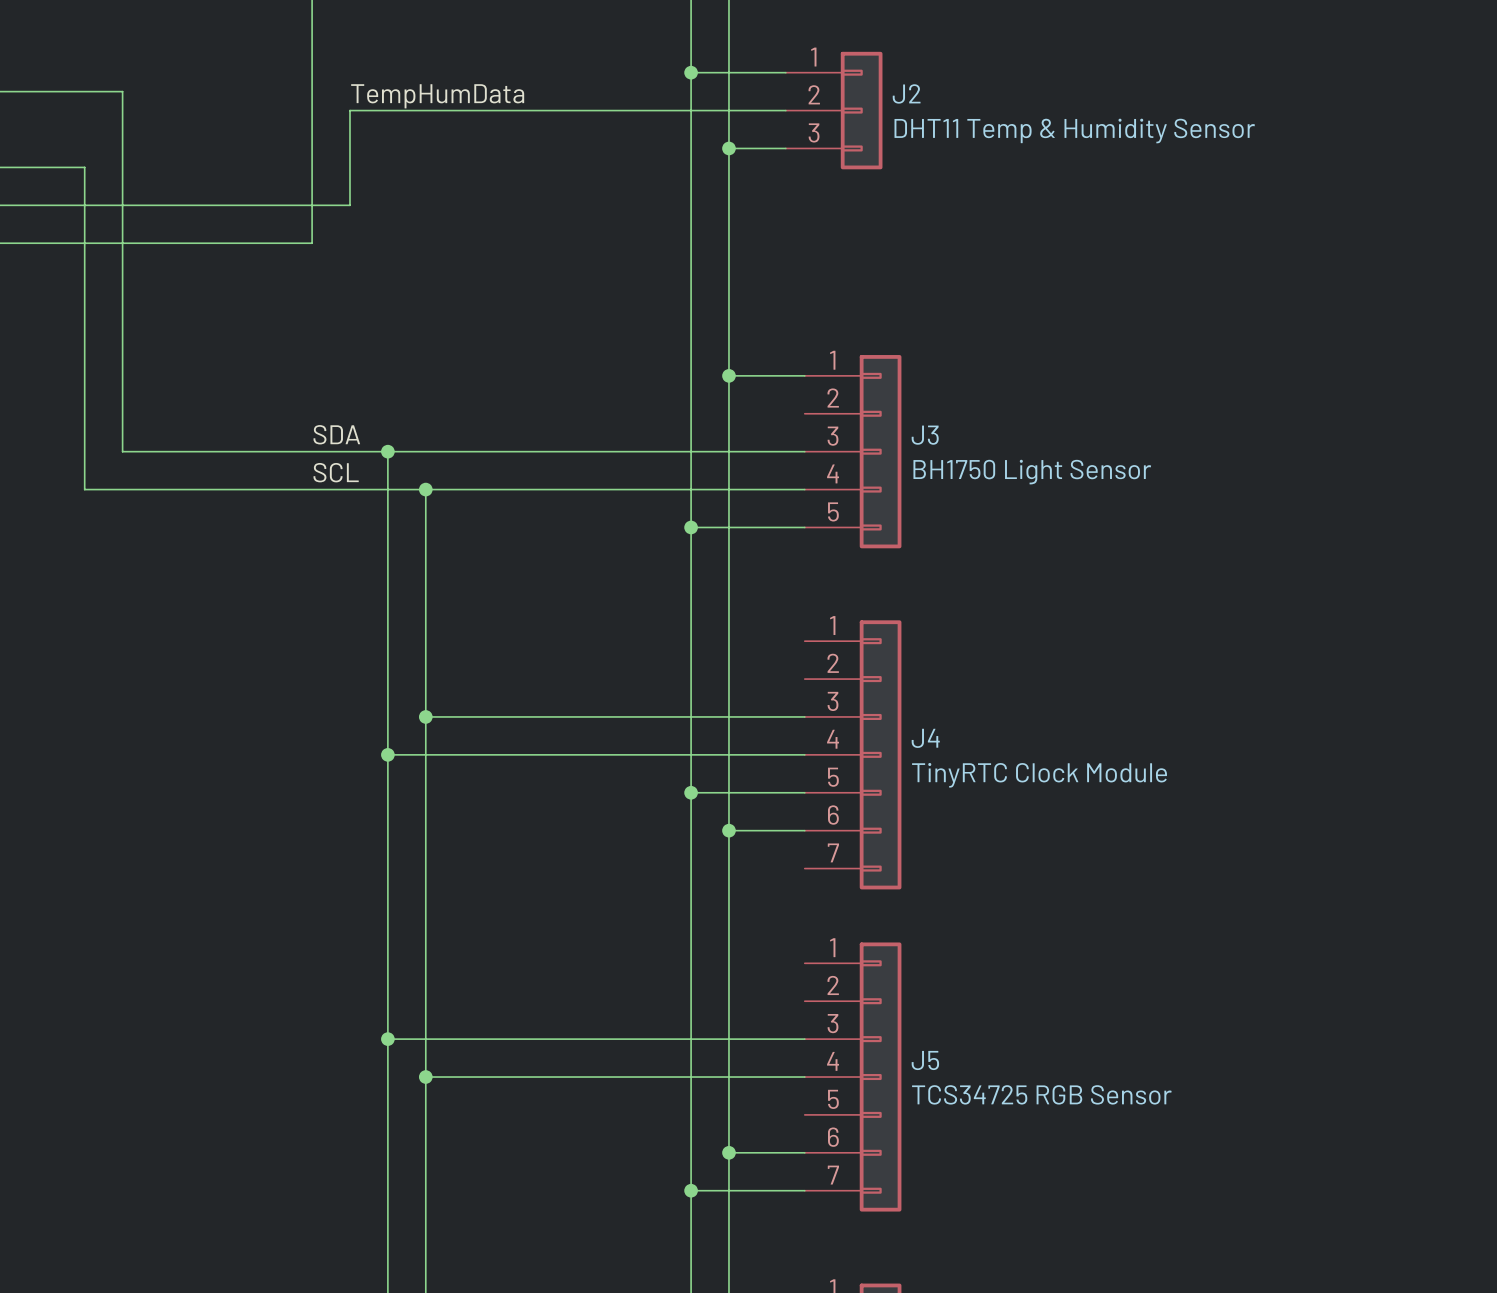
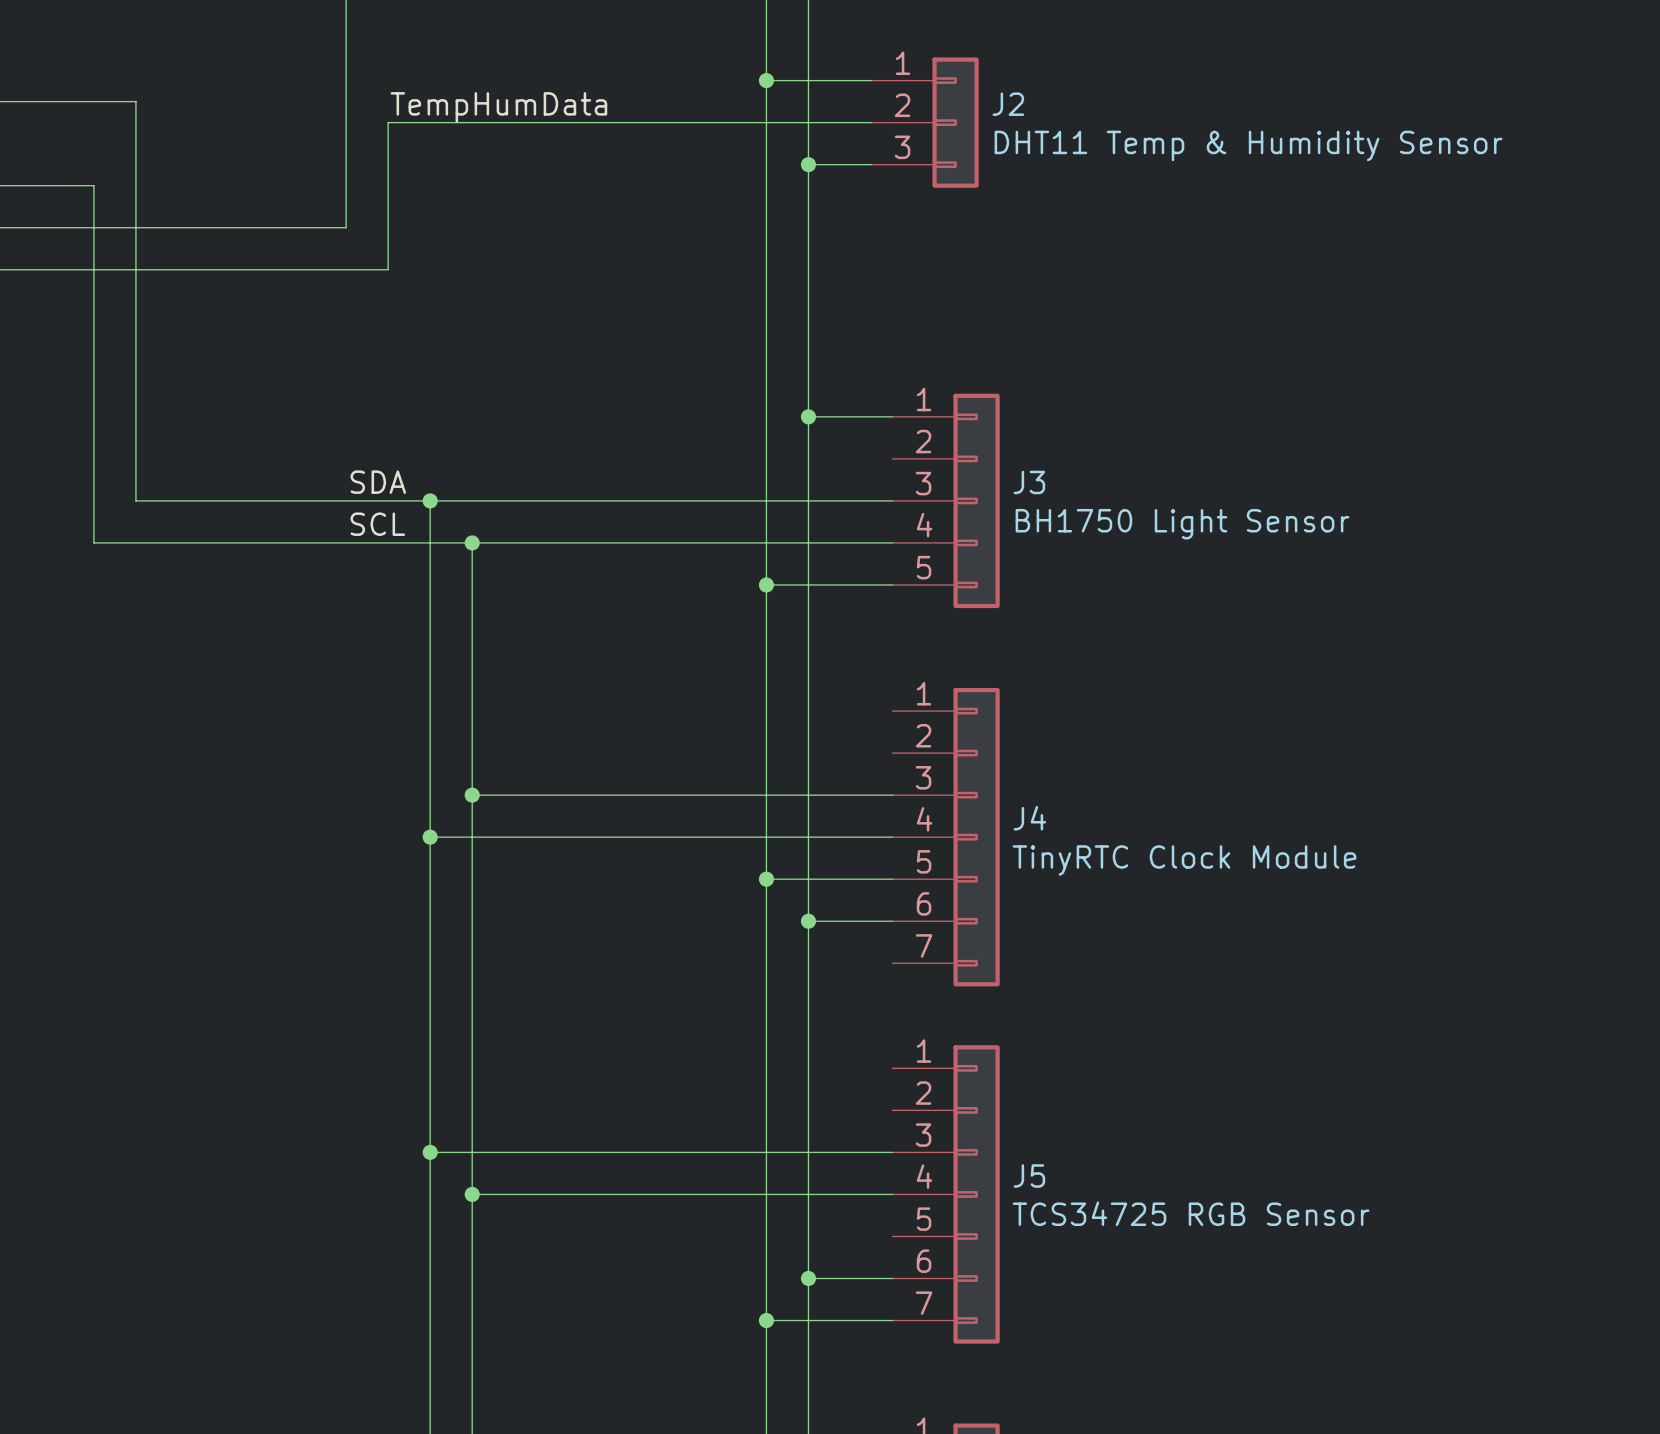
wire: (349, 205) (312, 205) (312, 243) -> (388, 227) (388, 269) (346, 269)

